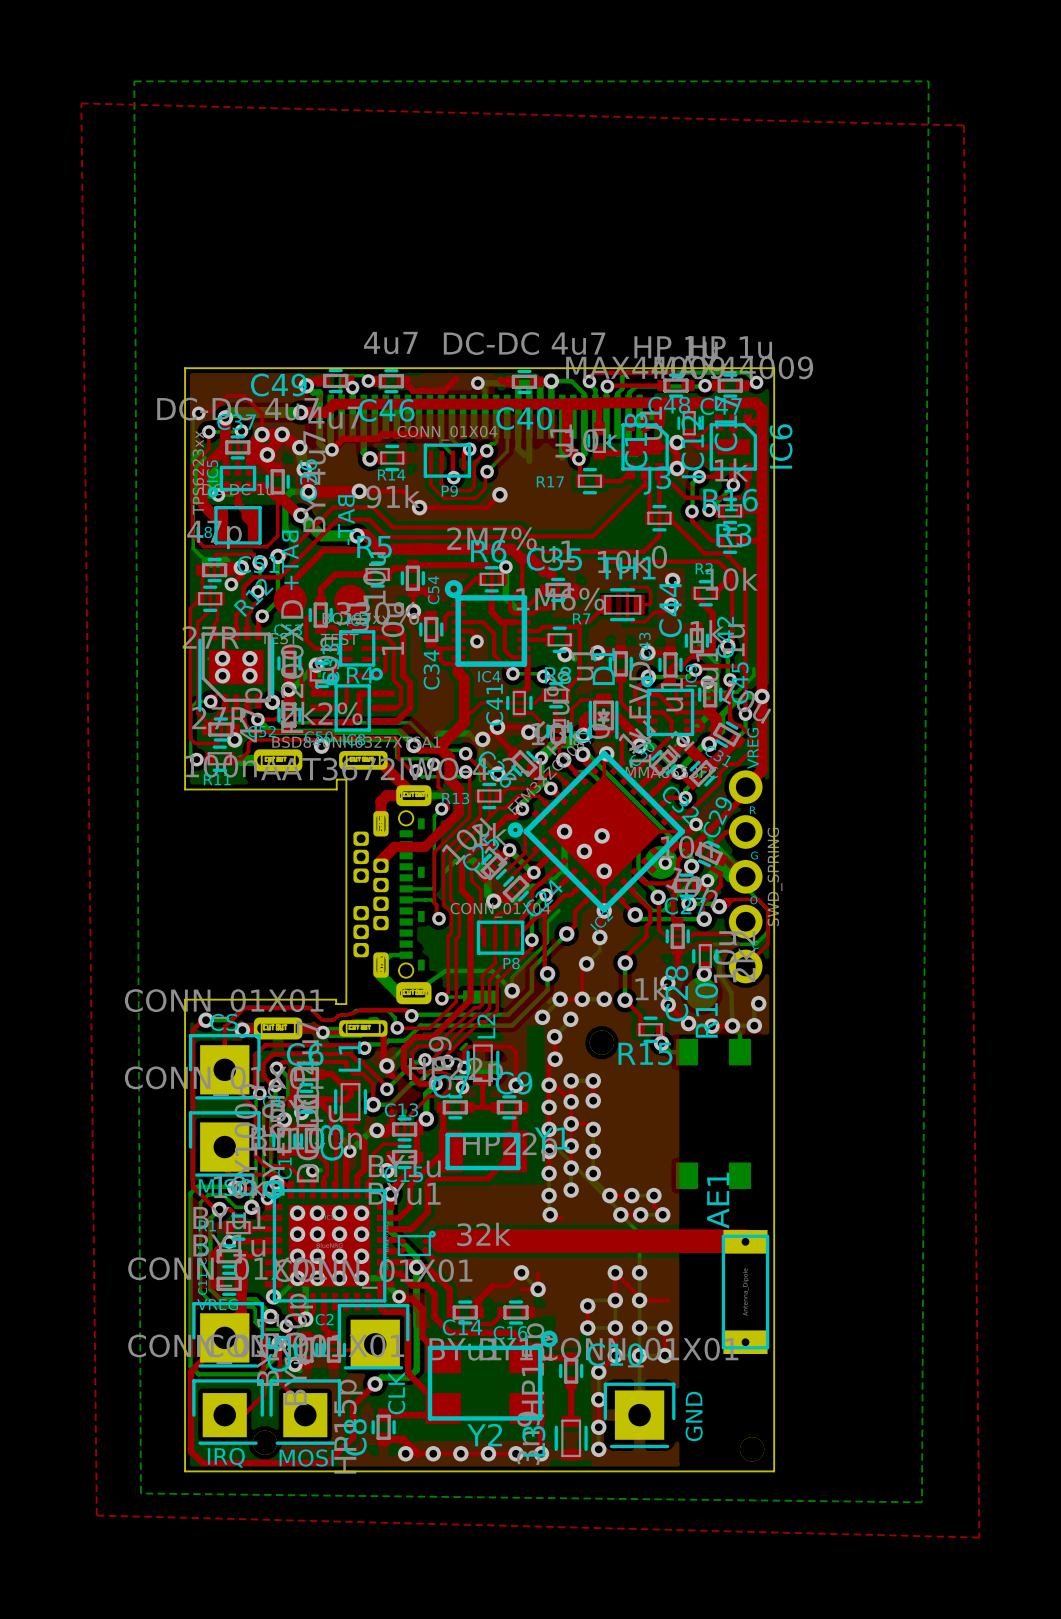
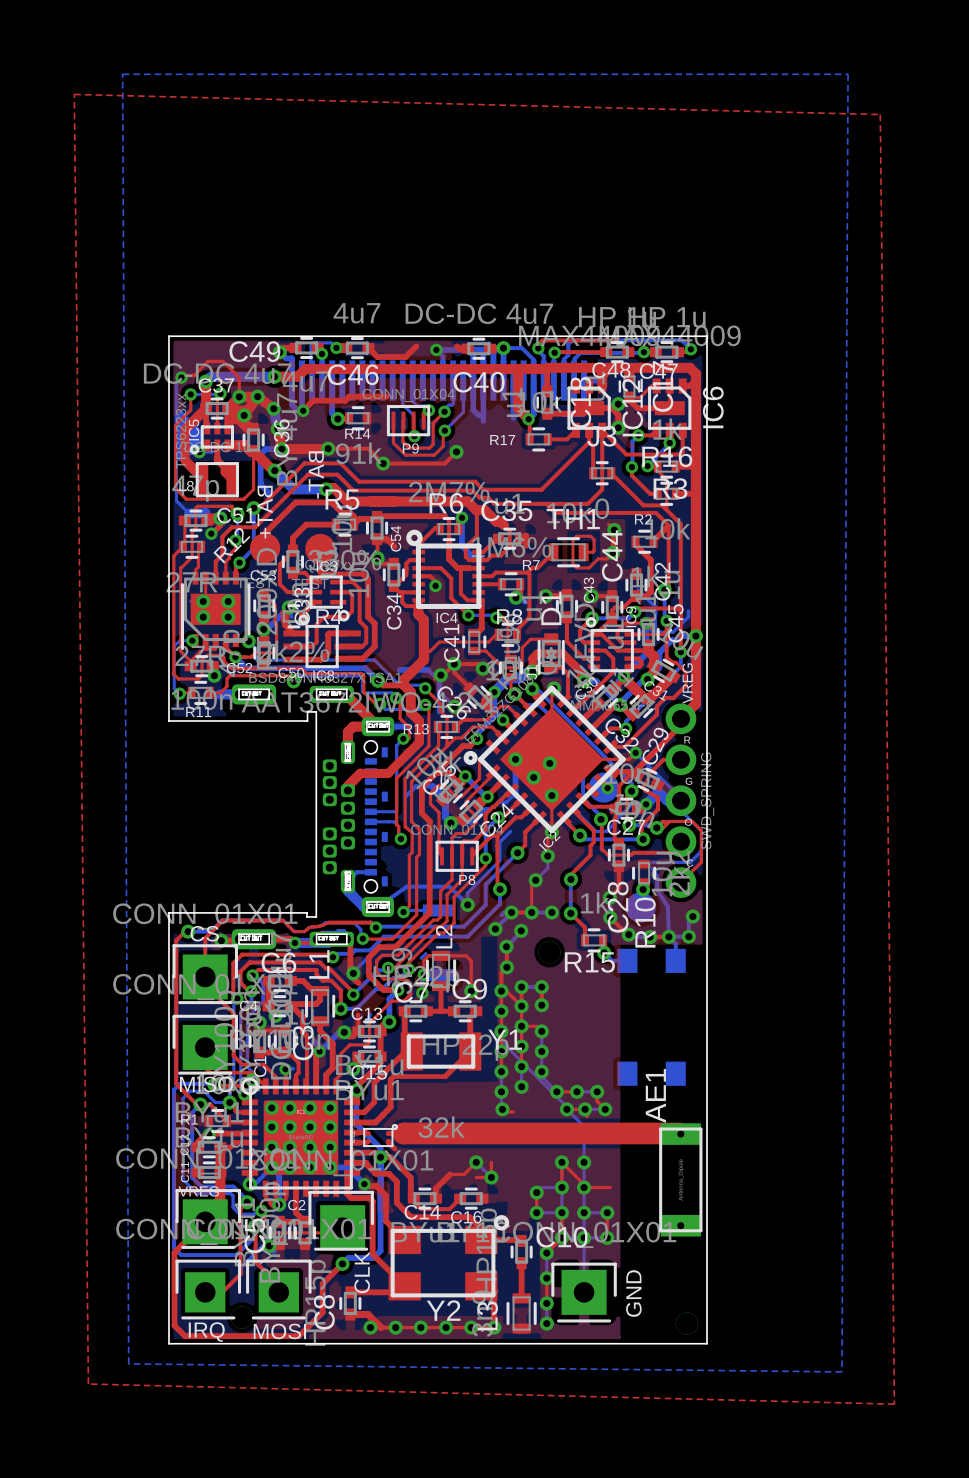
top track: none -> (327, 502) (331, 502) (341, 512) (350, 512) (353, 516) (353, 524)

